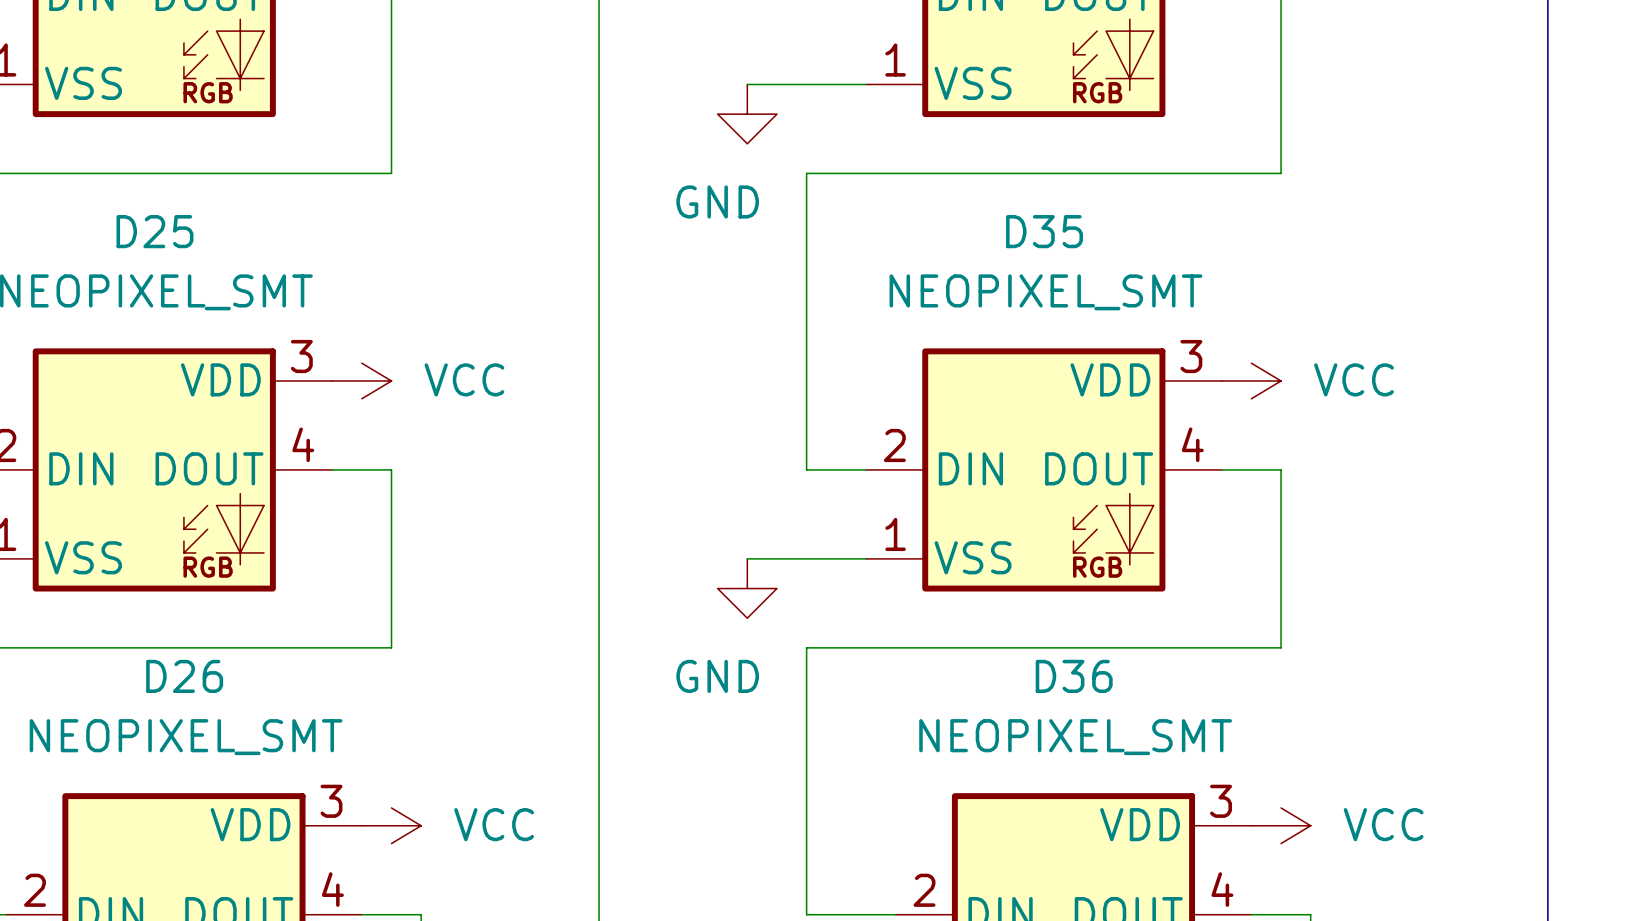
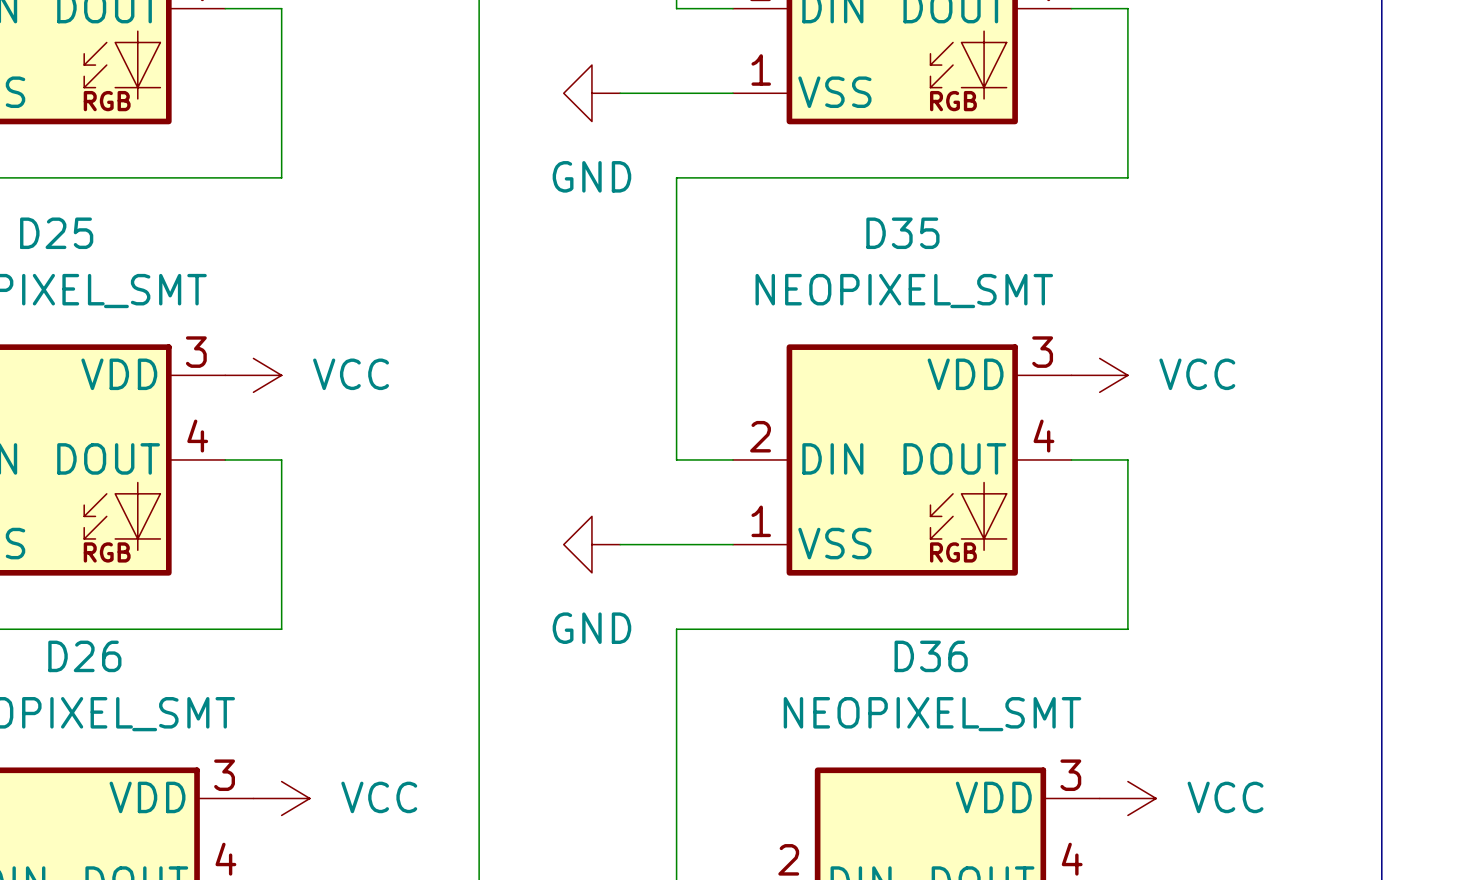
power symbol rotation: 0° (747, 114) -> 90° clockwise (591, 93)
power symbol position: GND (747, 114) -> GND (591, 93)
power symbol rotation: 0° (747, 588) -> 90° clockwise (591, 544)
power symbol position: GND (747, 588) -> GND (591, 544)

